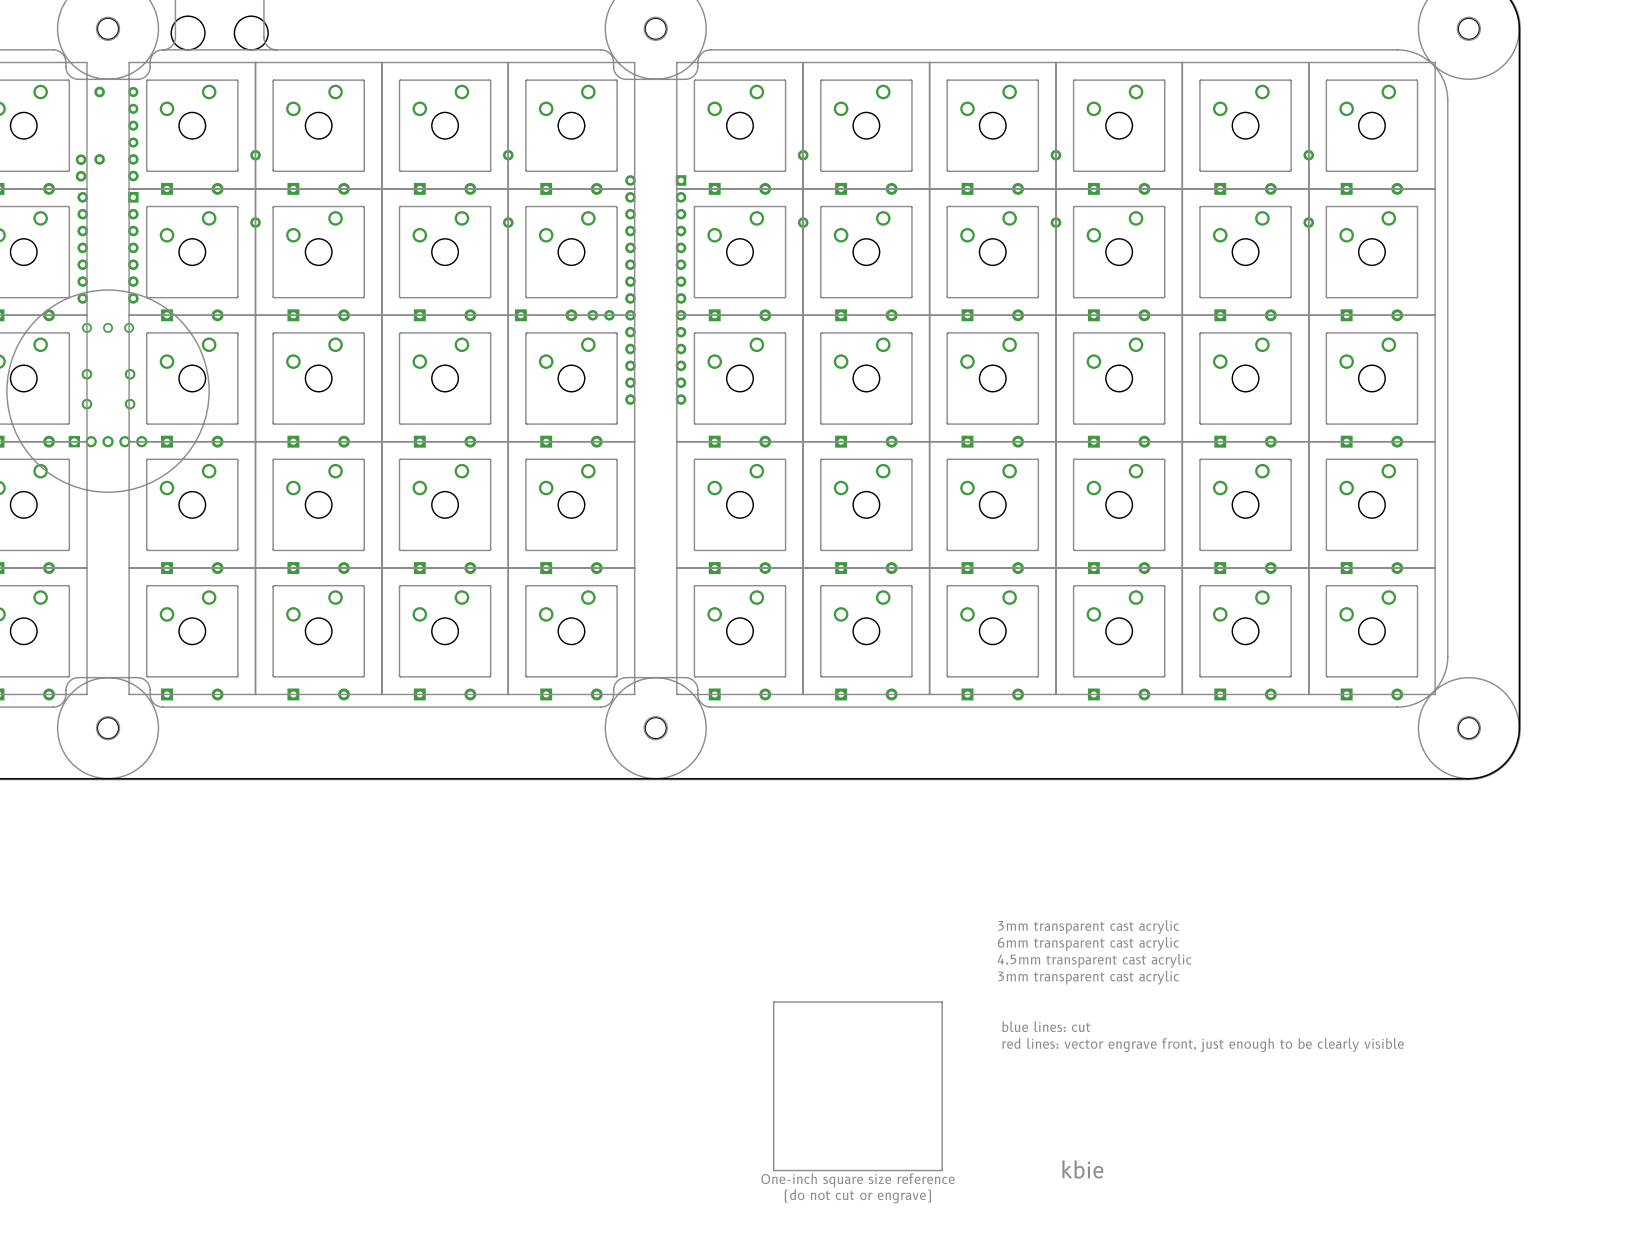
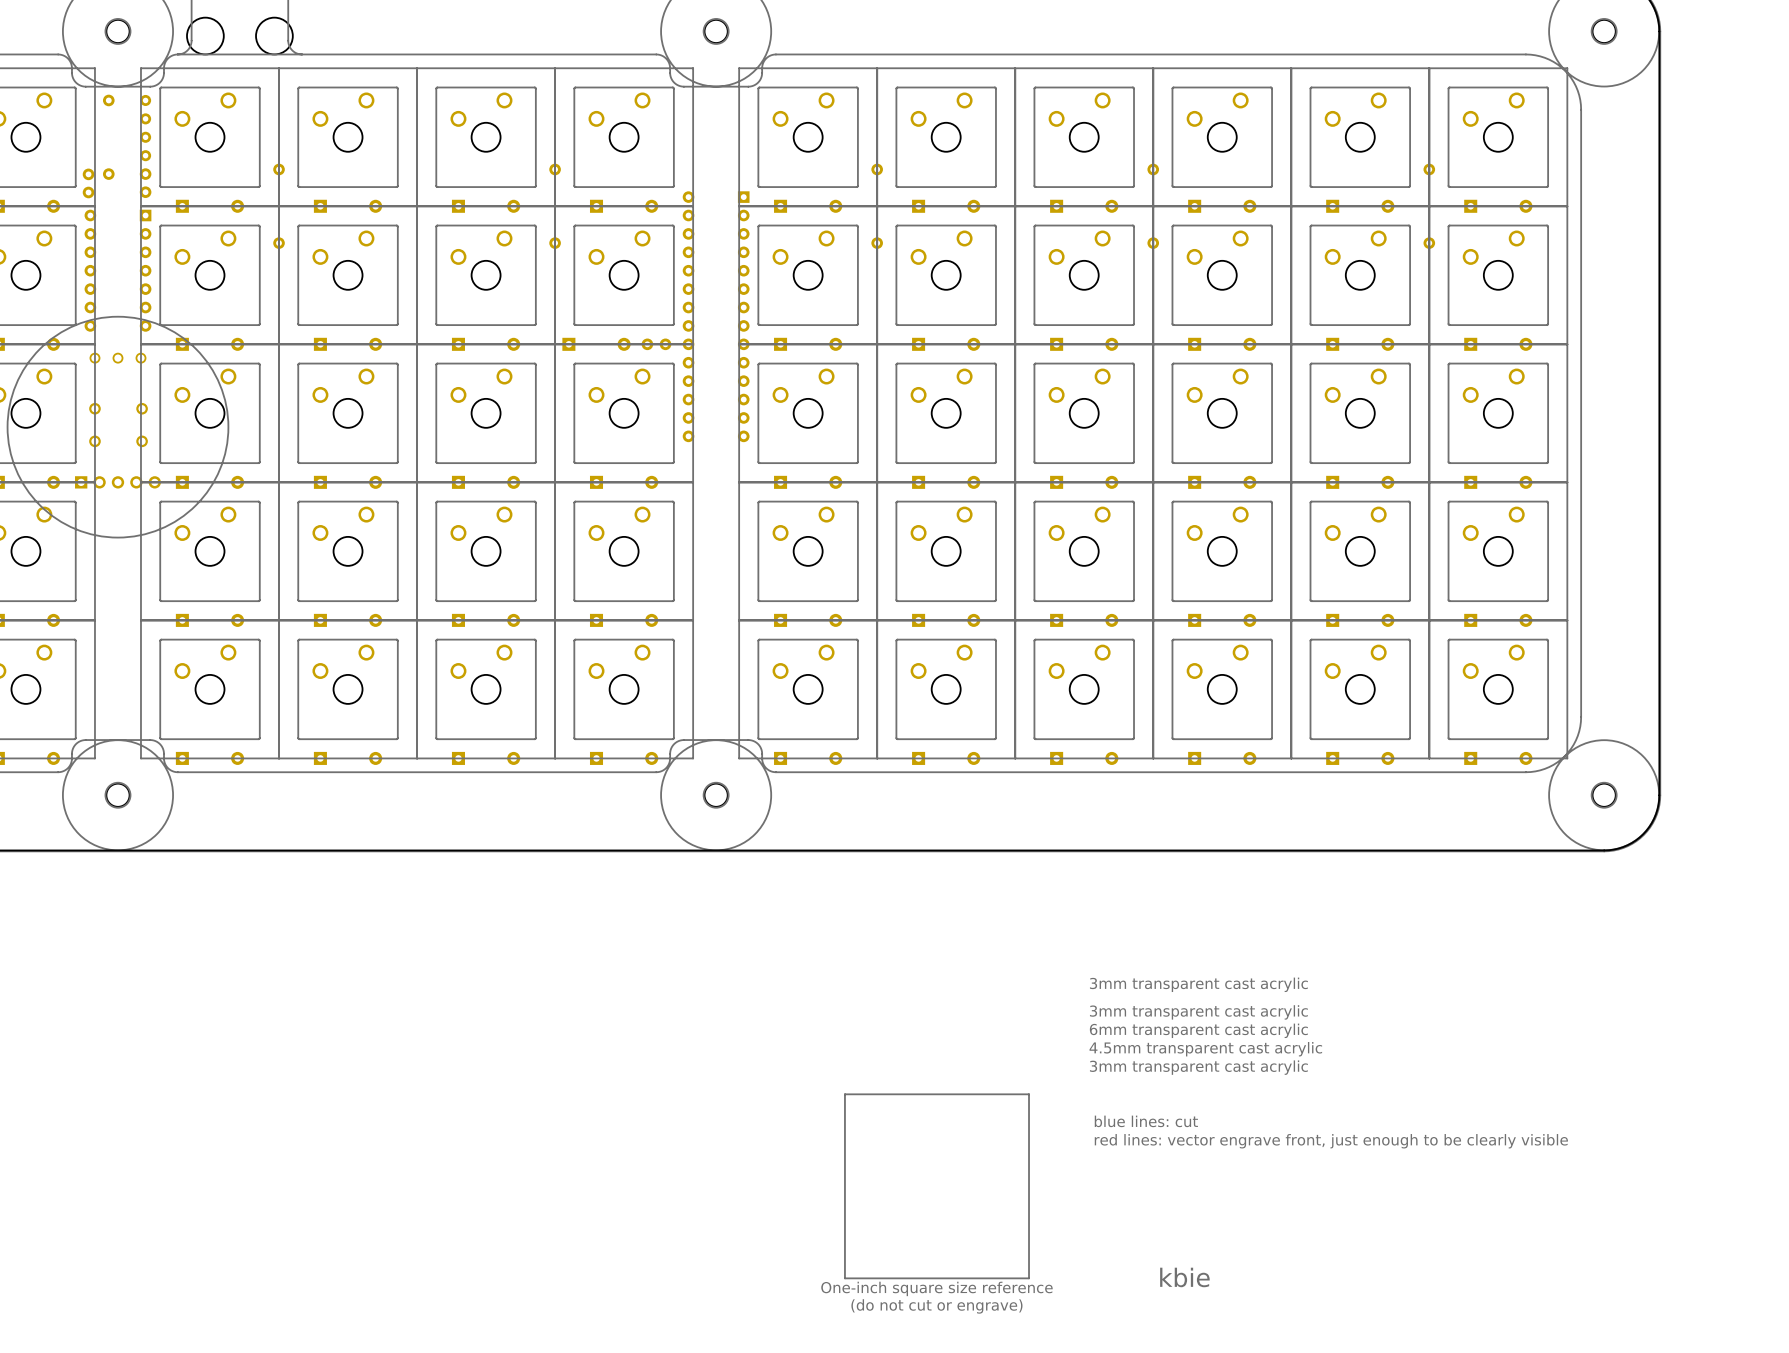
text: none -> 3mm transparent cast acrylic (1198, 984)

